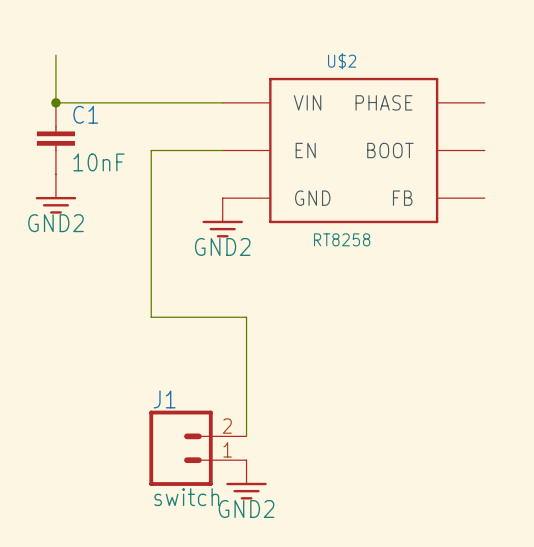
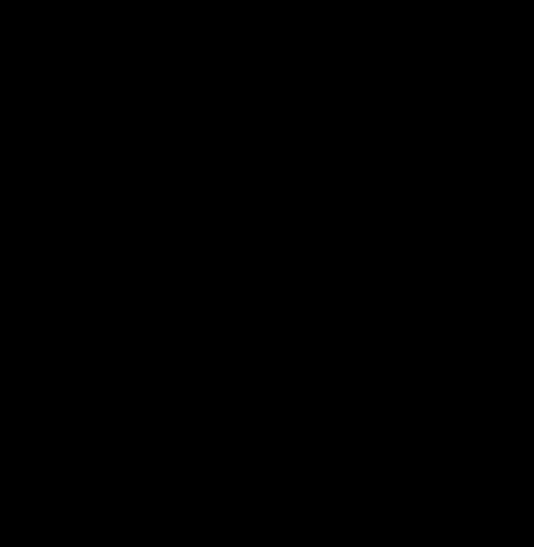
wire: (55, 55) (55, 102) (222, 102) -> none
junction: (55, 102) -> none
C1: 10nF (55, 138) -> none
wire: (222, 150) (151, 150) (151, 317) (246, 317) (246, 436) -> none
U$2: RT8258 (353, 150) -> none
power symbol: GND2 (55, 193) -> none
power symbol: GND2 (222, 217) -> none
J1: switch (197, 448) -> none
power symbol: GND2 (246, 479) -> none

